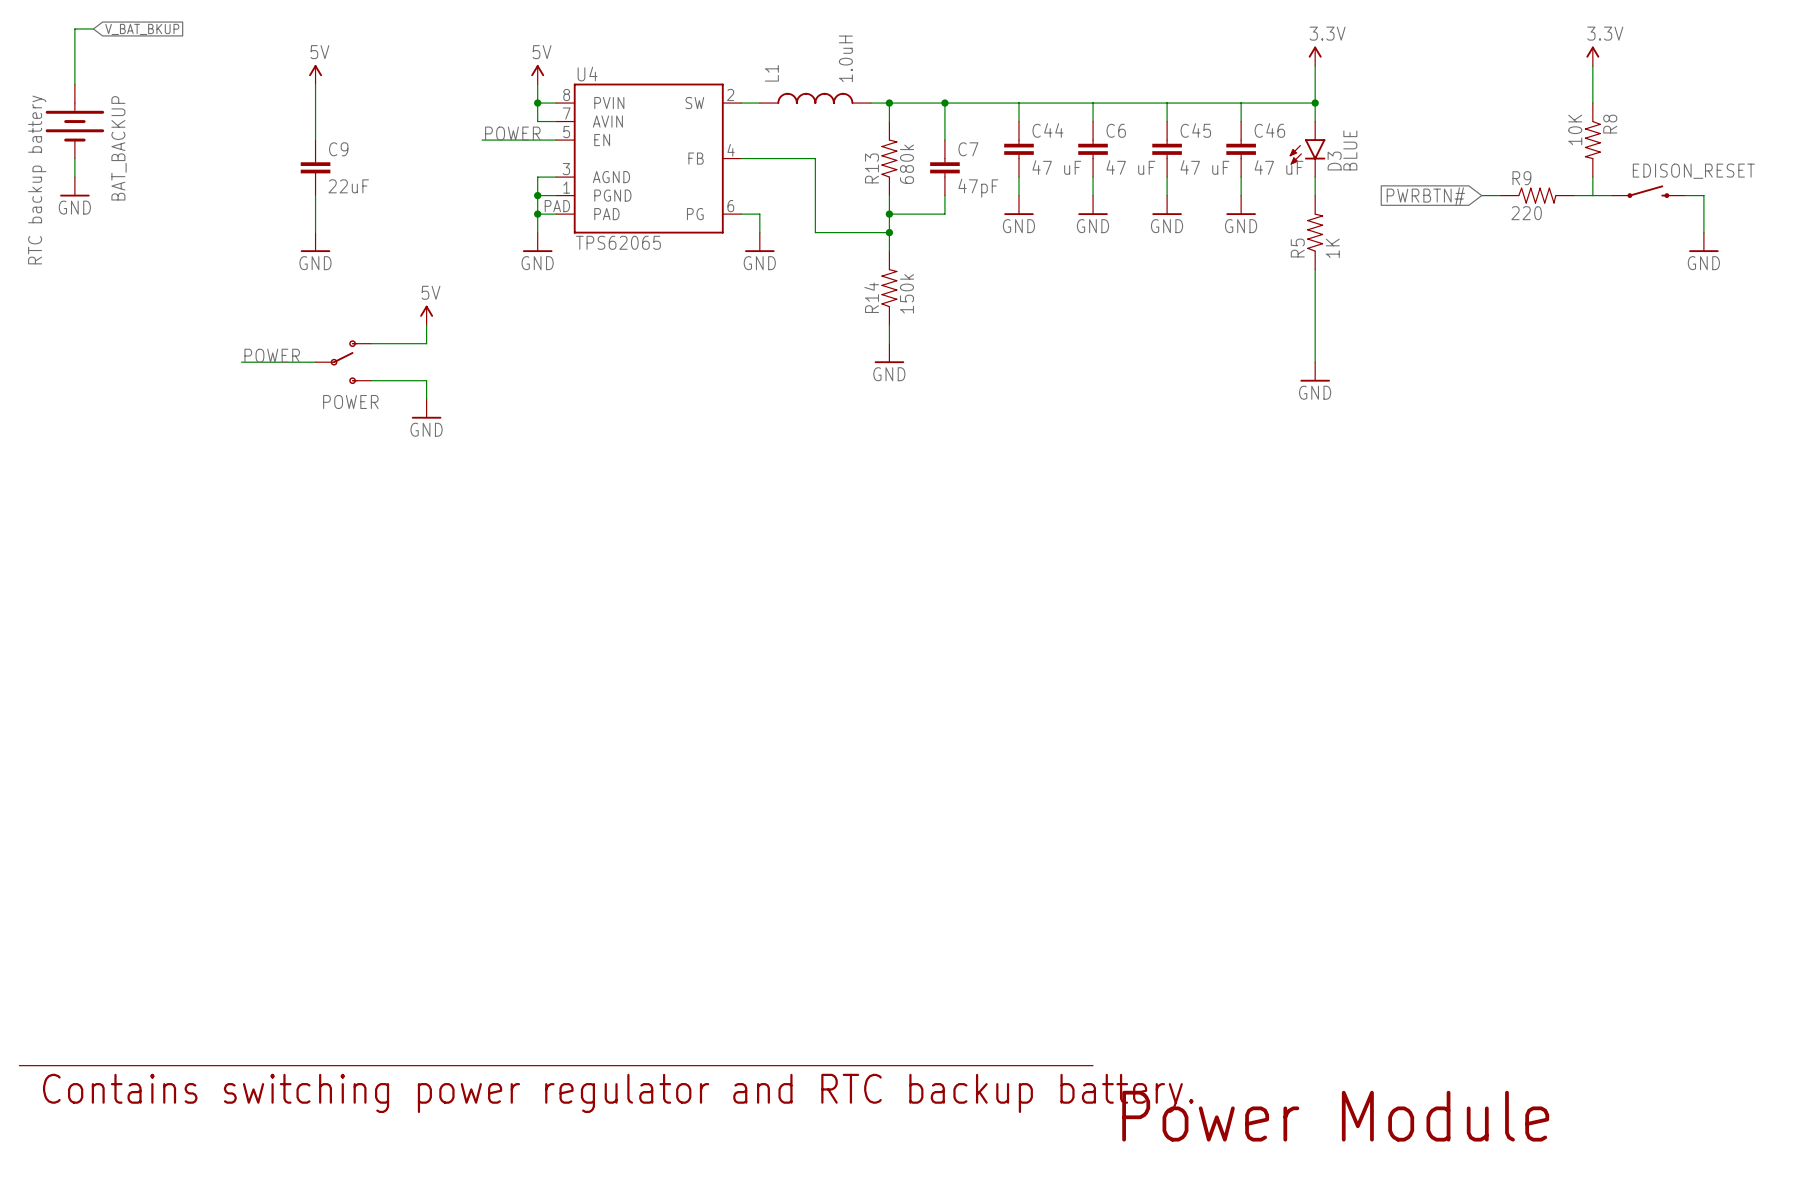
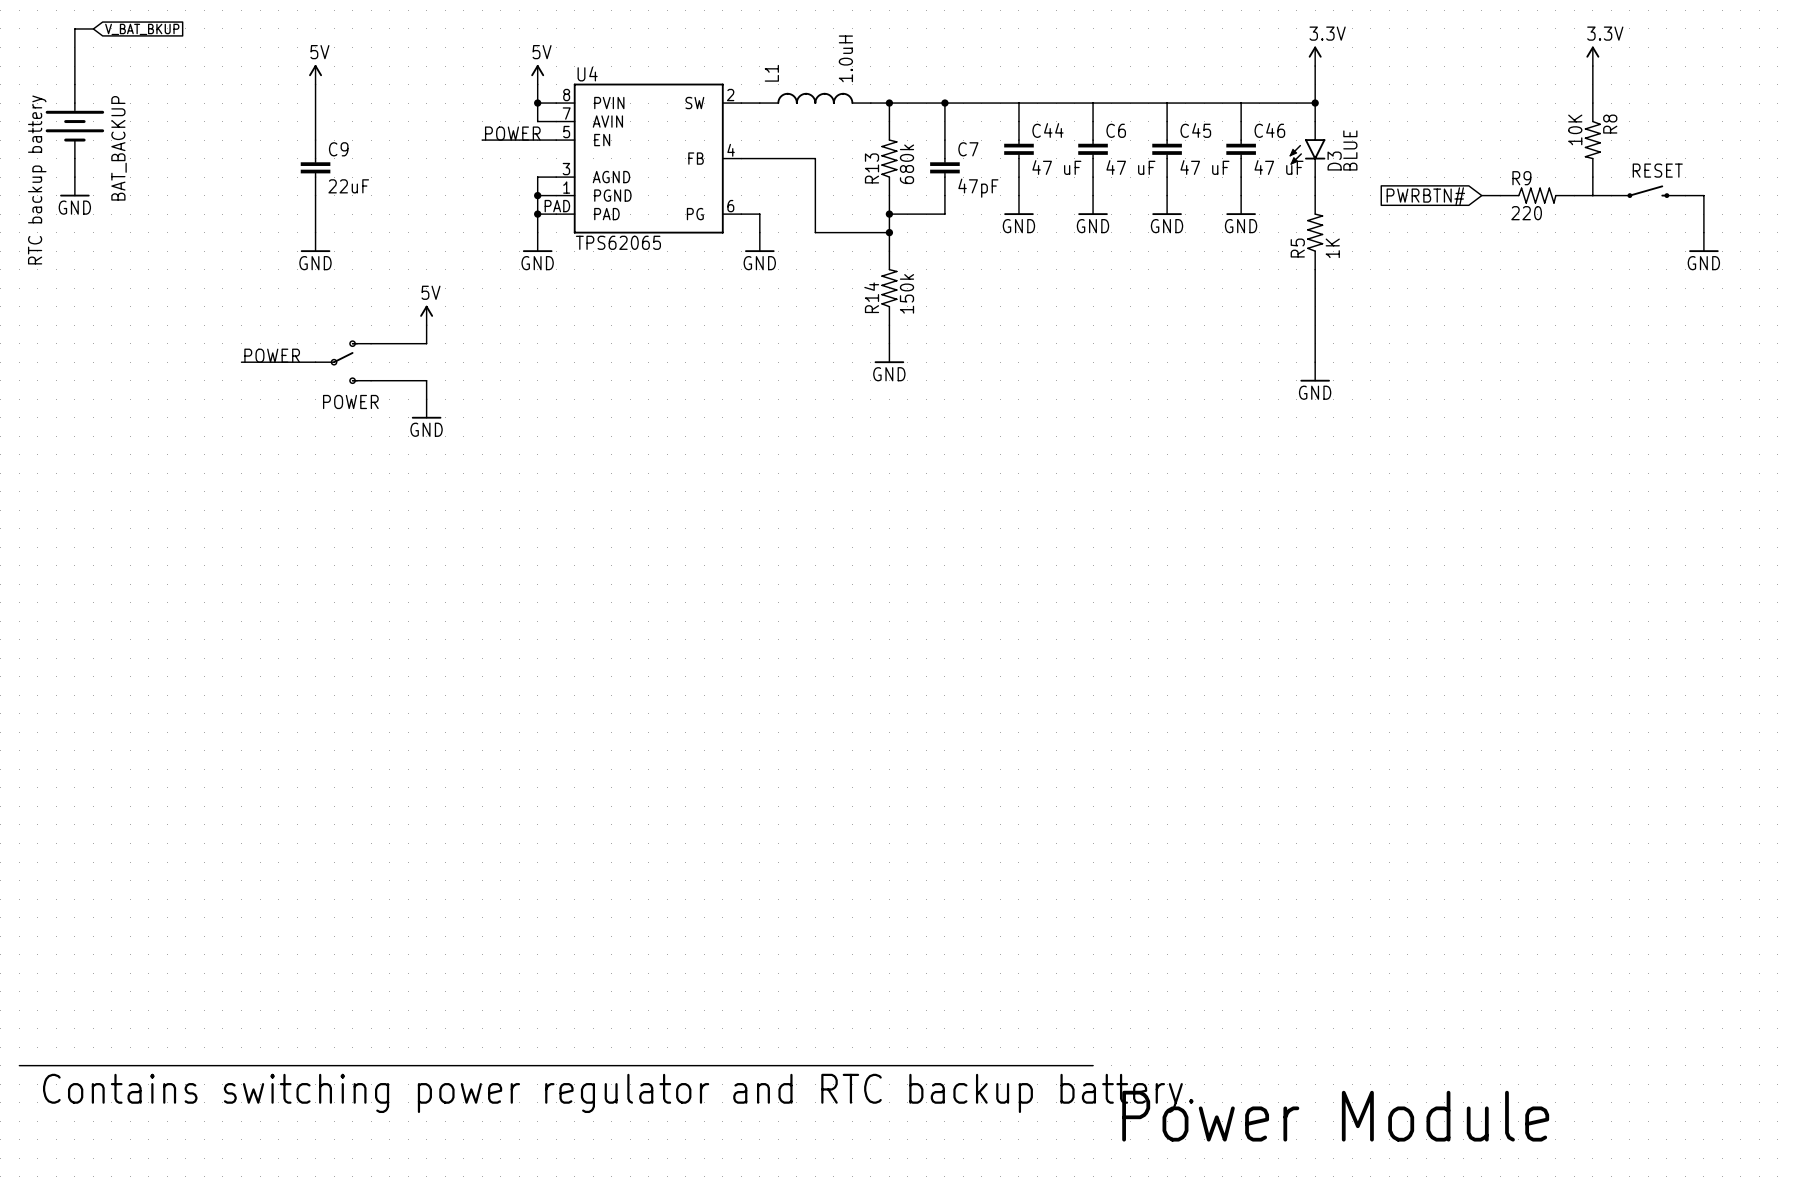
EDISON_RESET name: EDISON_RESET (1693, 171) -> RESET (1657, 170)

